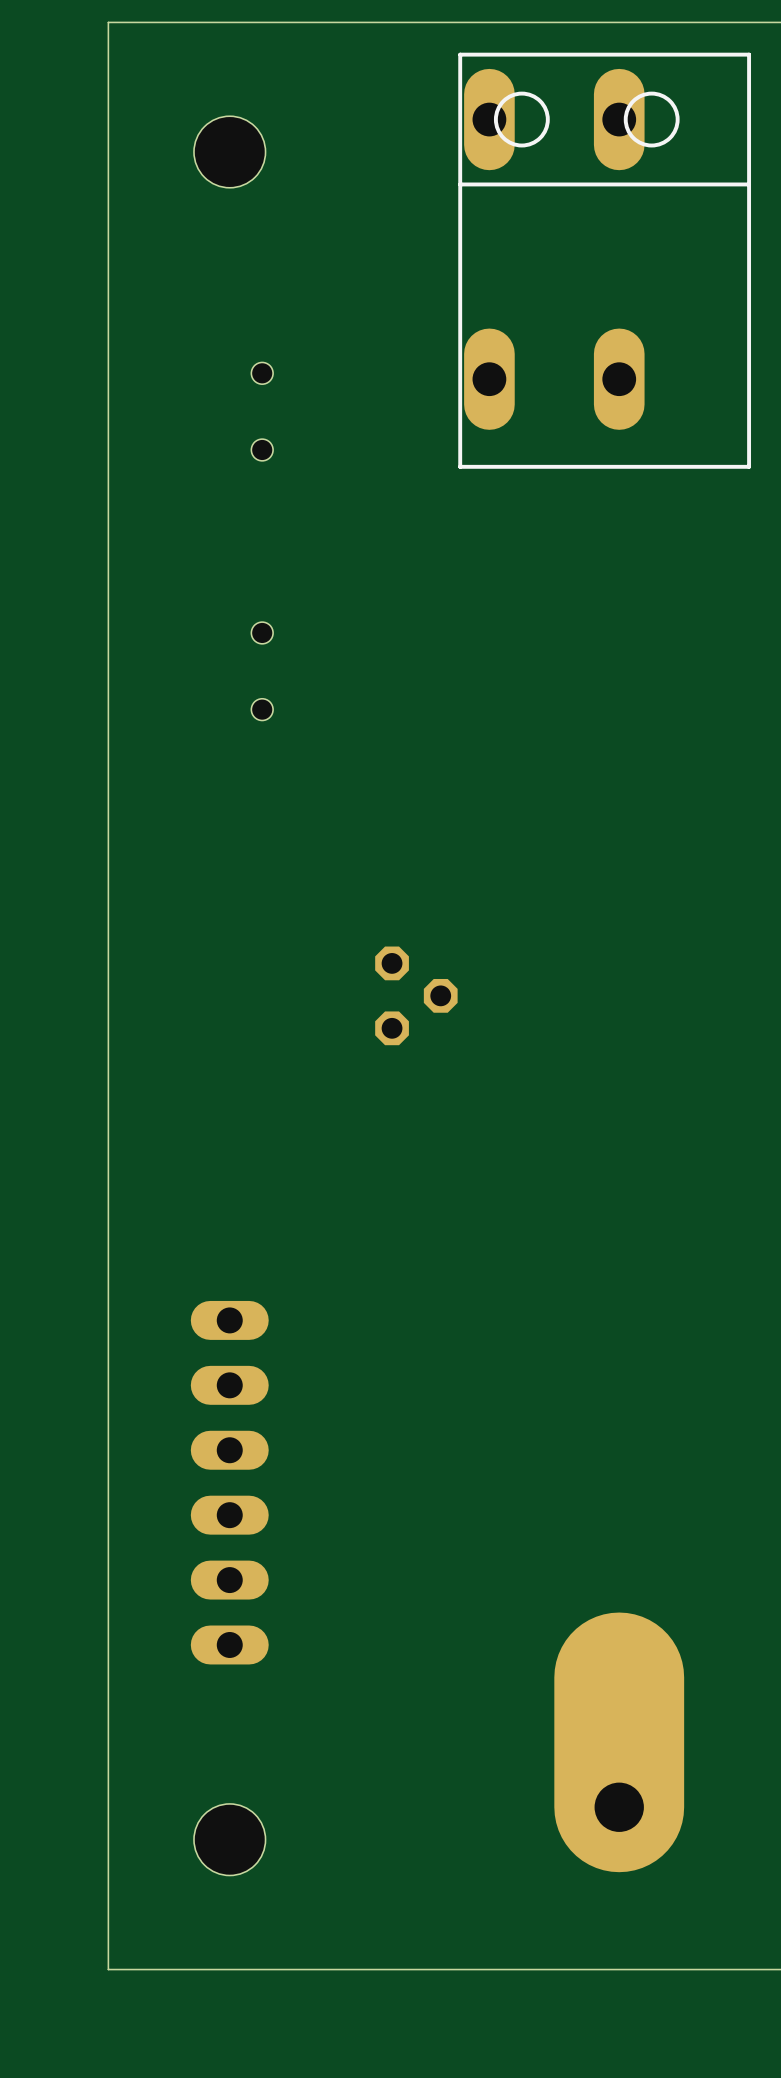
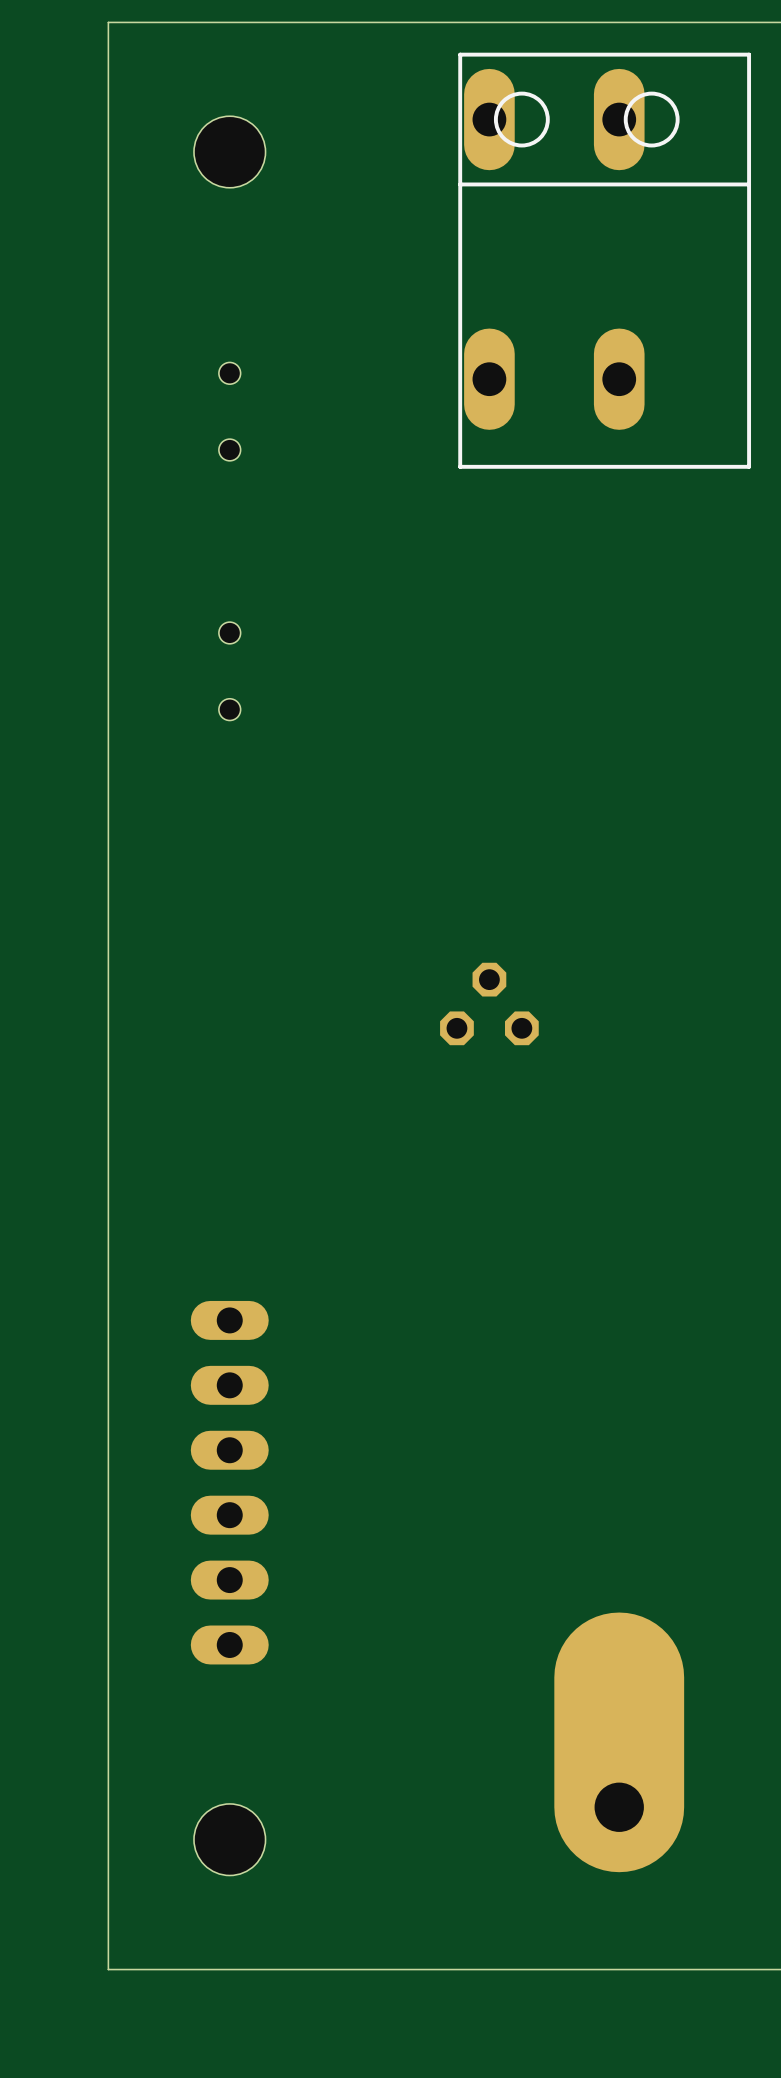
part position: (262, 411) -> (229, 411)
part position: (262, 671) -> (229, 671)
part rotation: 0° (416, 995) -> 90° counterclockwise (489, 1003)
part position: (416, 995) -> (489, 1003)

